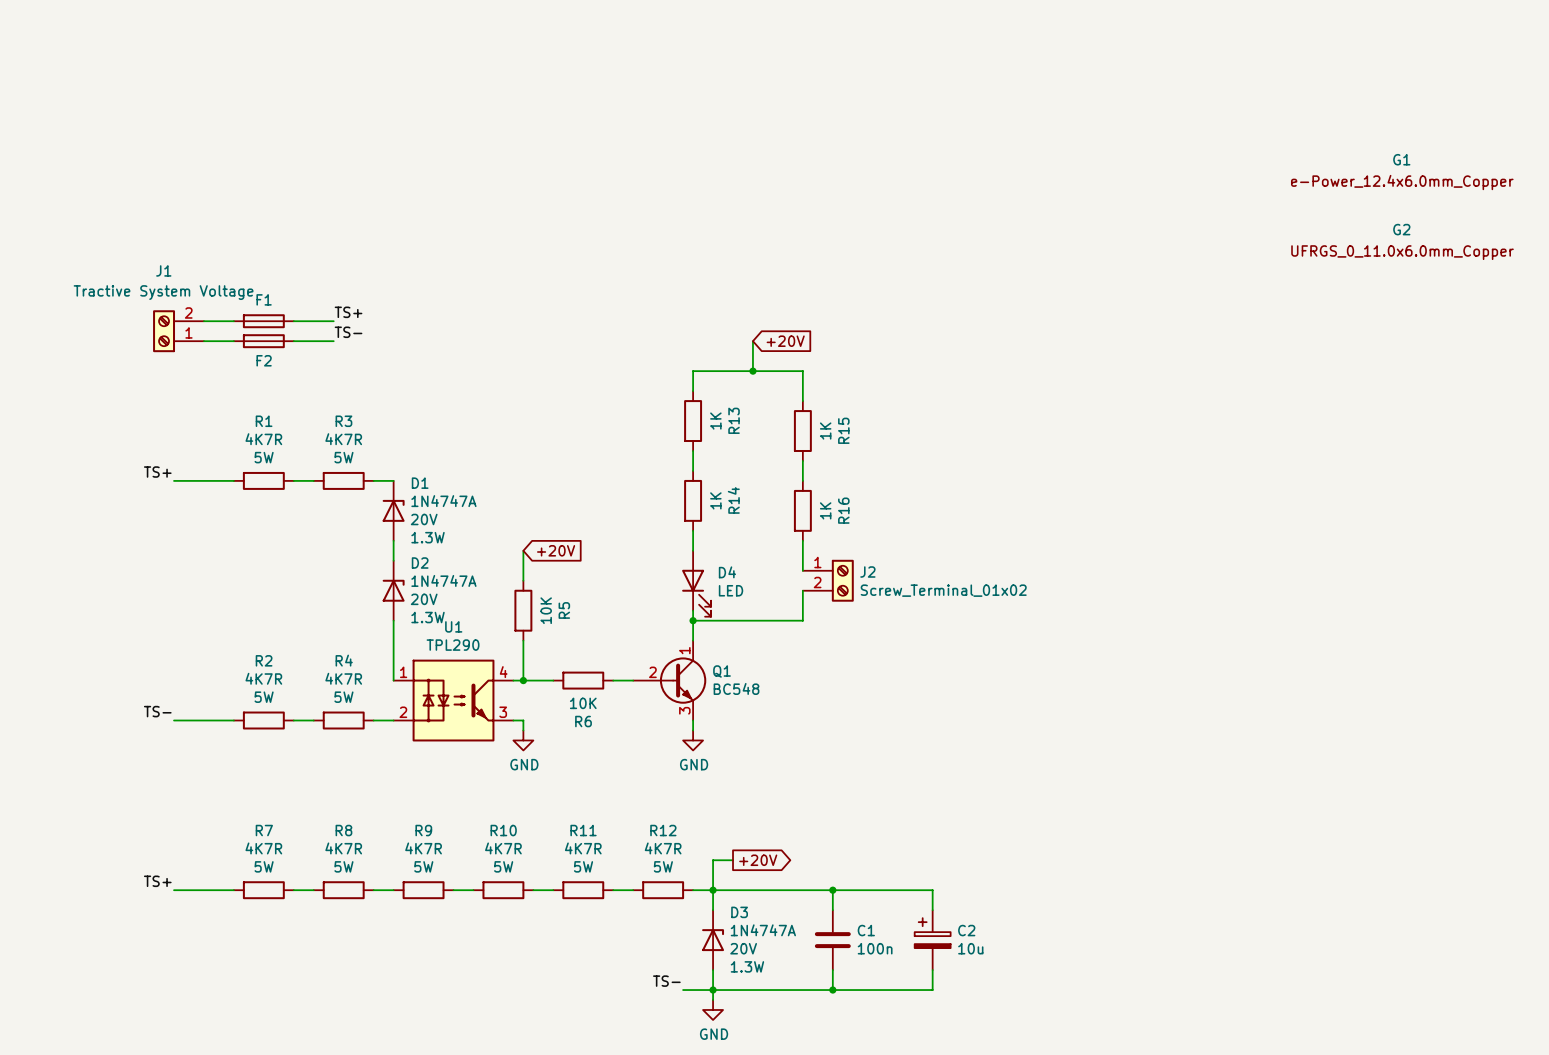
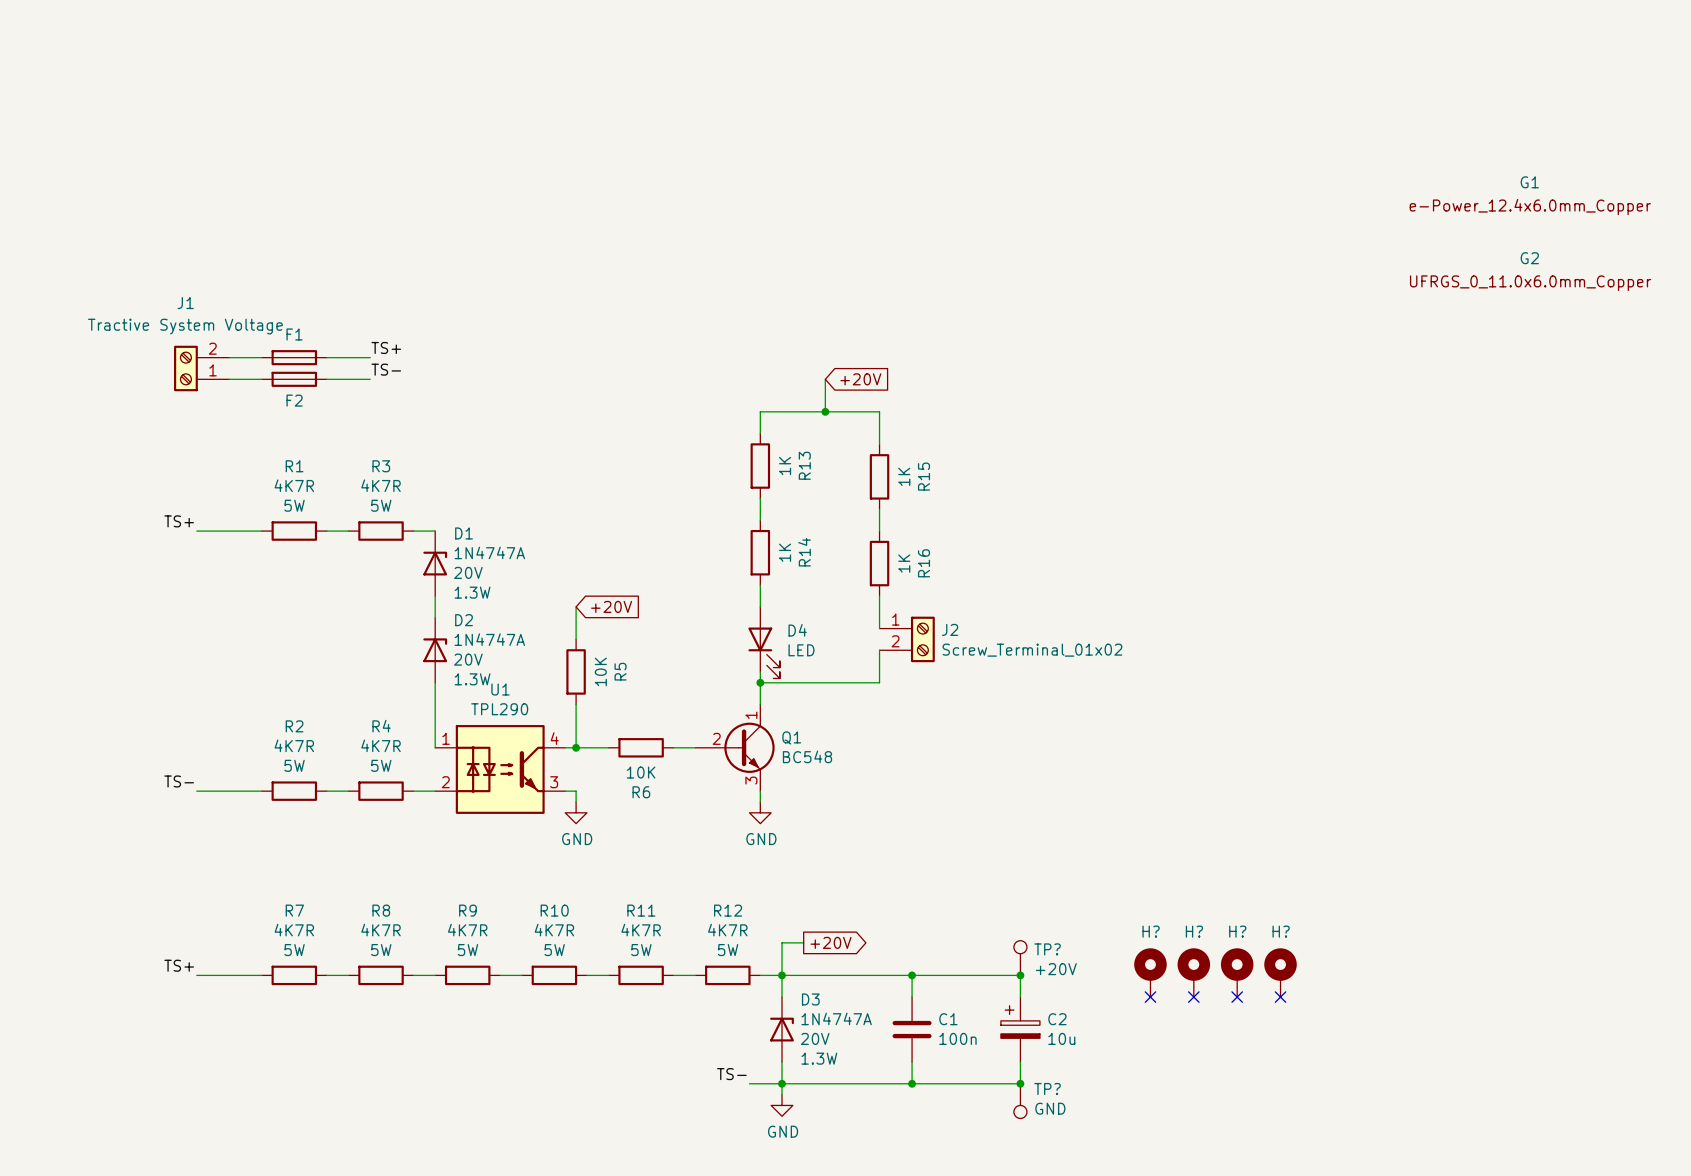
TP?: none -> +20V (1020, 958)
H?: none -> (1150, 972)
H?: none -> (1193, 972)
H?: none -> (1237, 972)
H?: none -> (1280, 972)
junction: none -> (1020, 975)
no-connect mark: none -> (1150, 997)
no-connect mark: none -> (1193, 997)
no-connect mark: none -> (1237, 997)
no-connect mark: none -> (1280, 997)
junction: none -> (1020, 1083)
TP?: none -> GND (1020, 1101)

